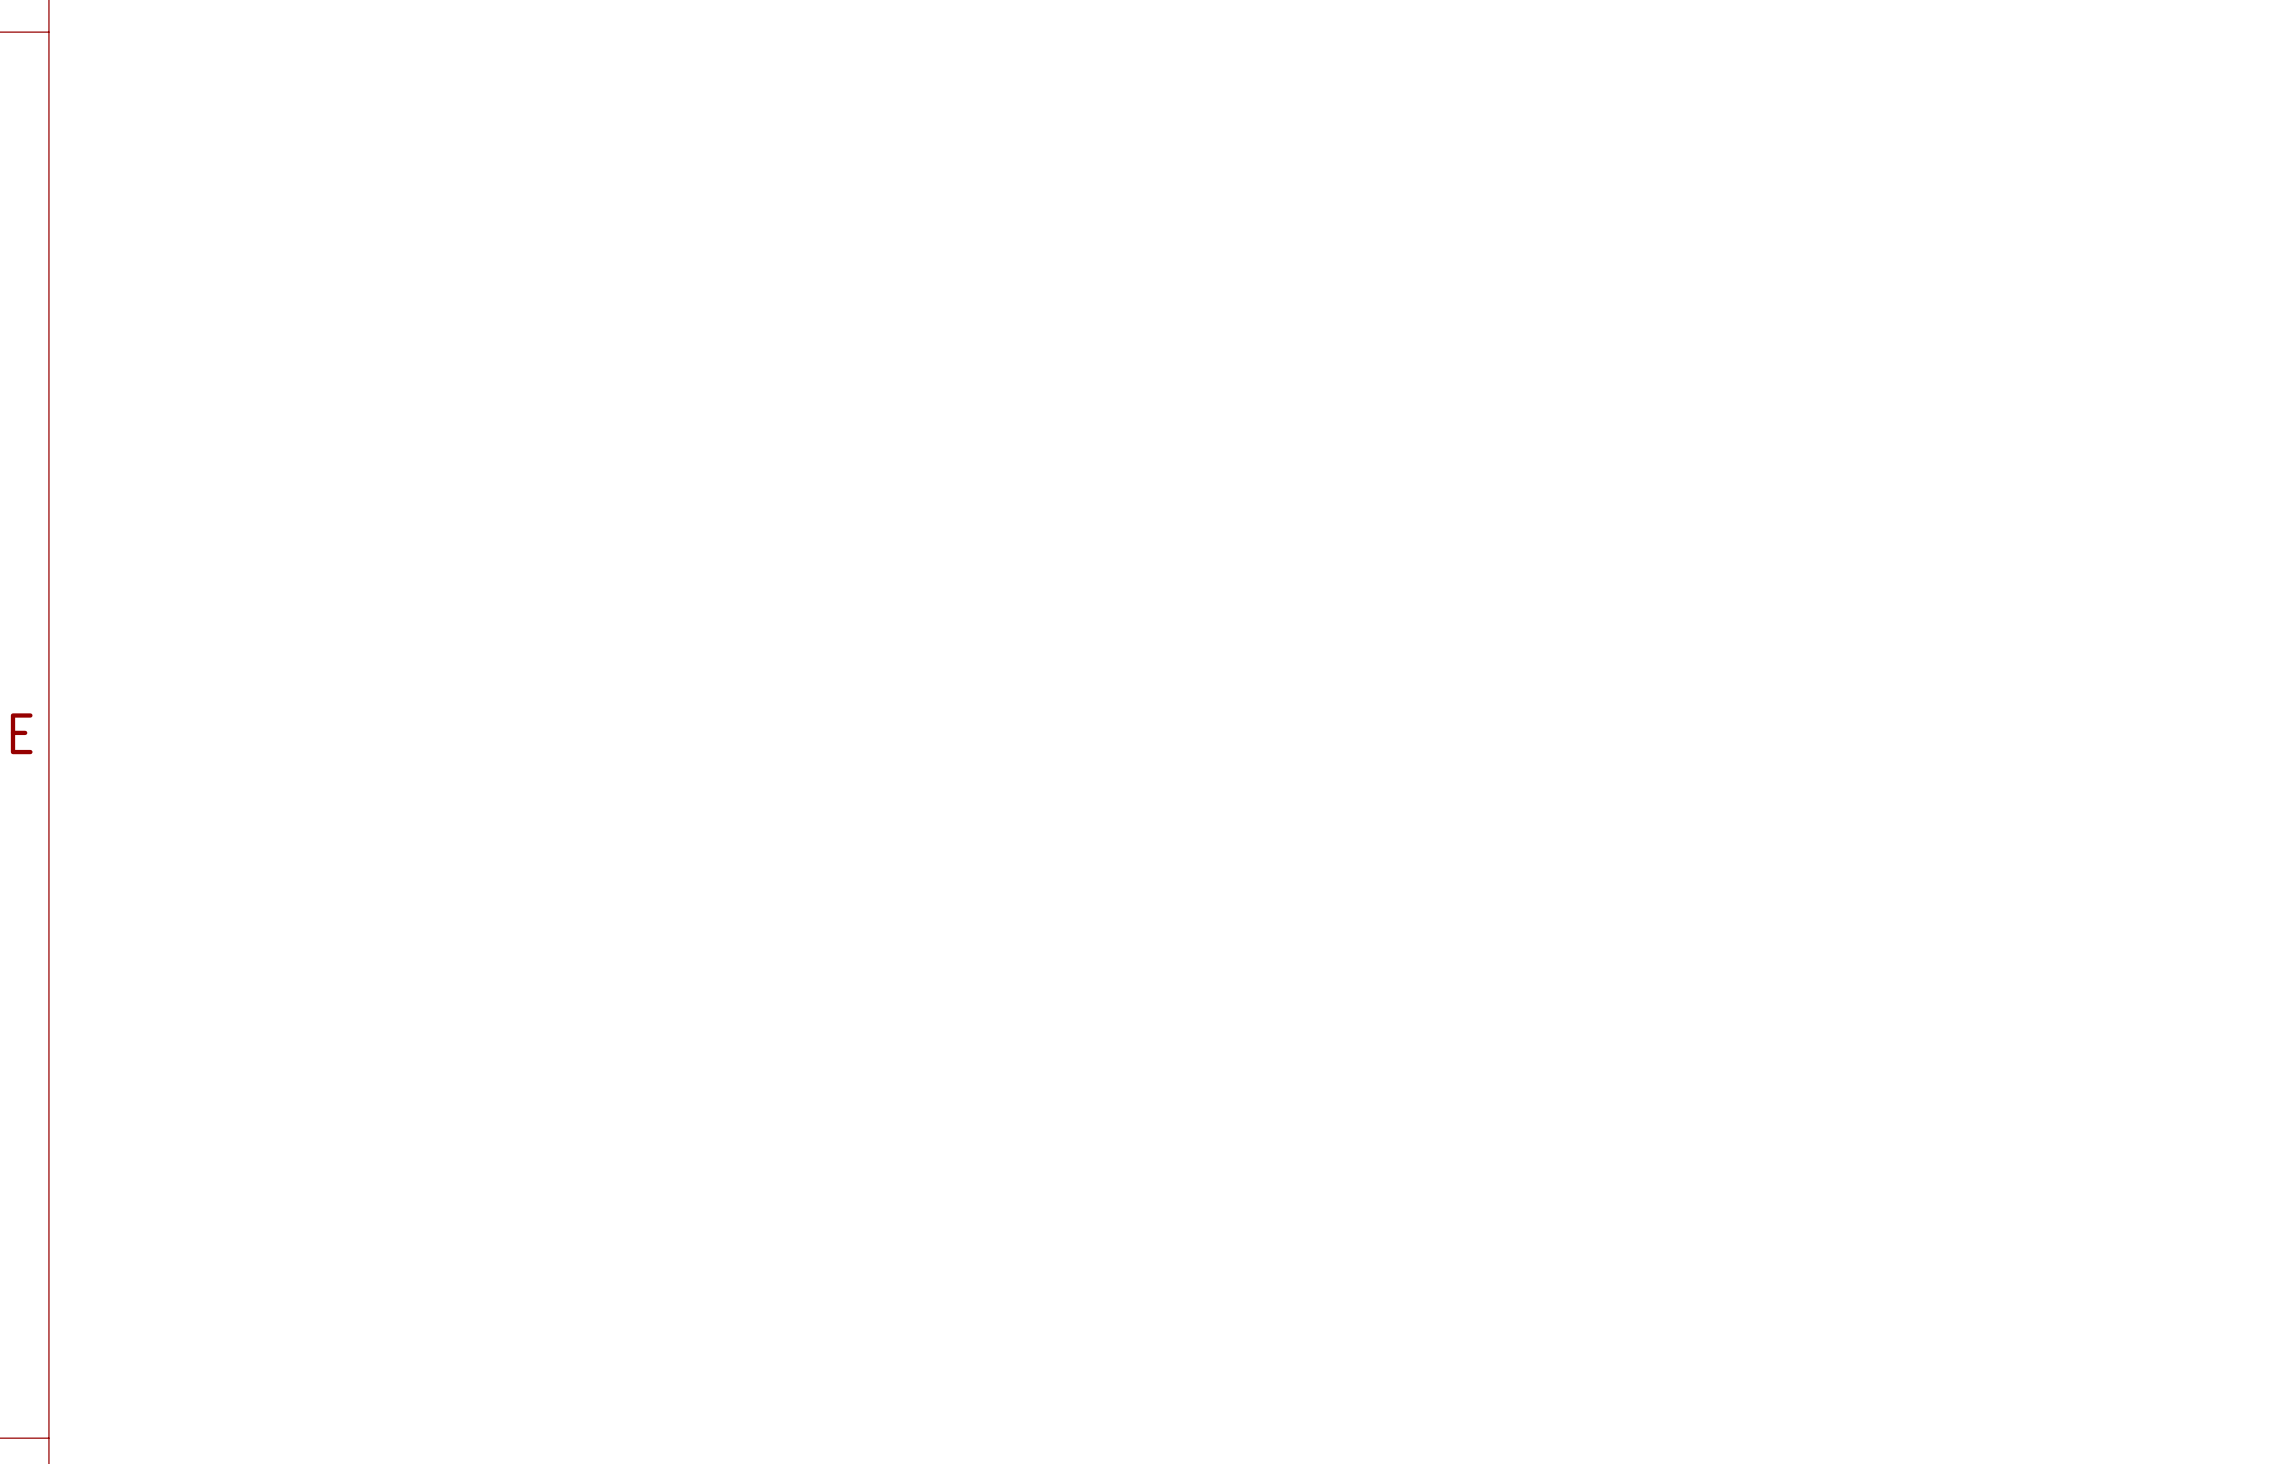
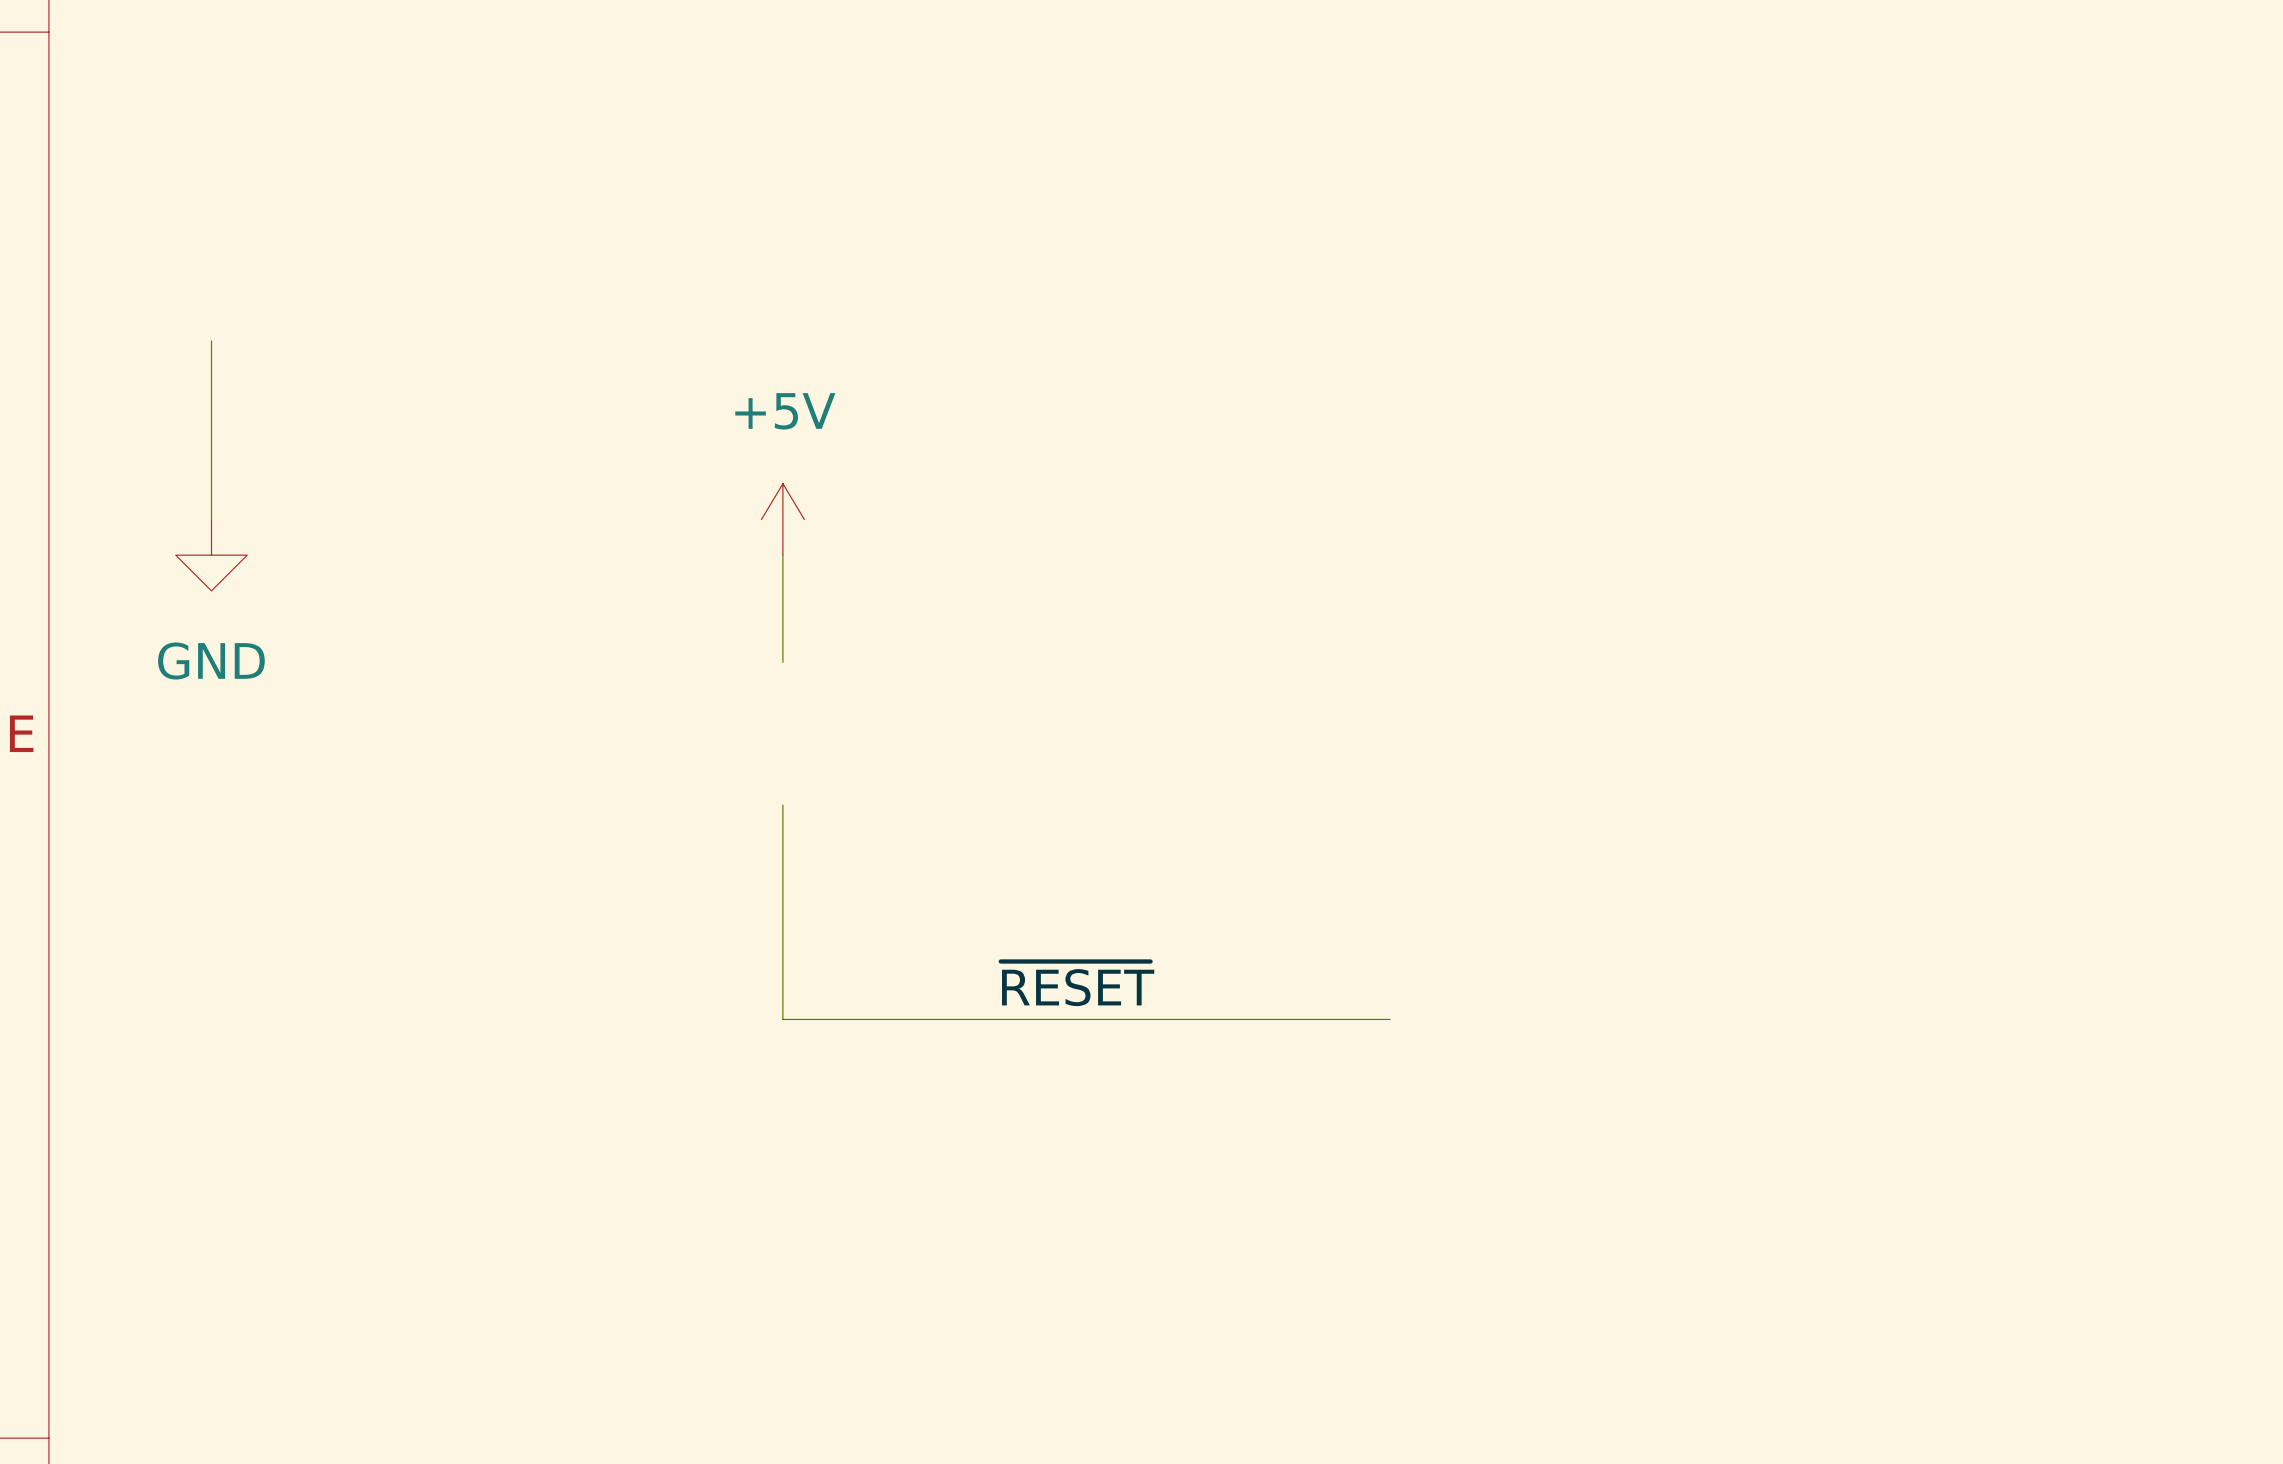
wire: none -> (211, 340) (211, 519)
power symbol: none -> +5V (782, 519)
power symbol: none -> GND (211, 555)
wire: none -> (782, 555) (782, 662)
wire: none -> (782, 805) (782, 1019) (1390, 1019)
label: none -> ~{RESET} (1077, 983)

